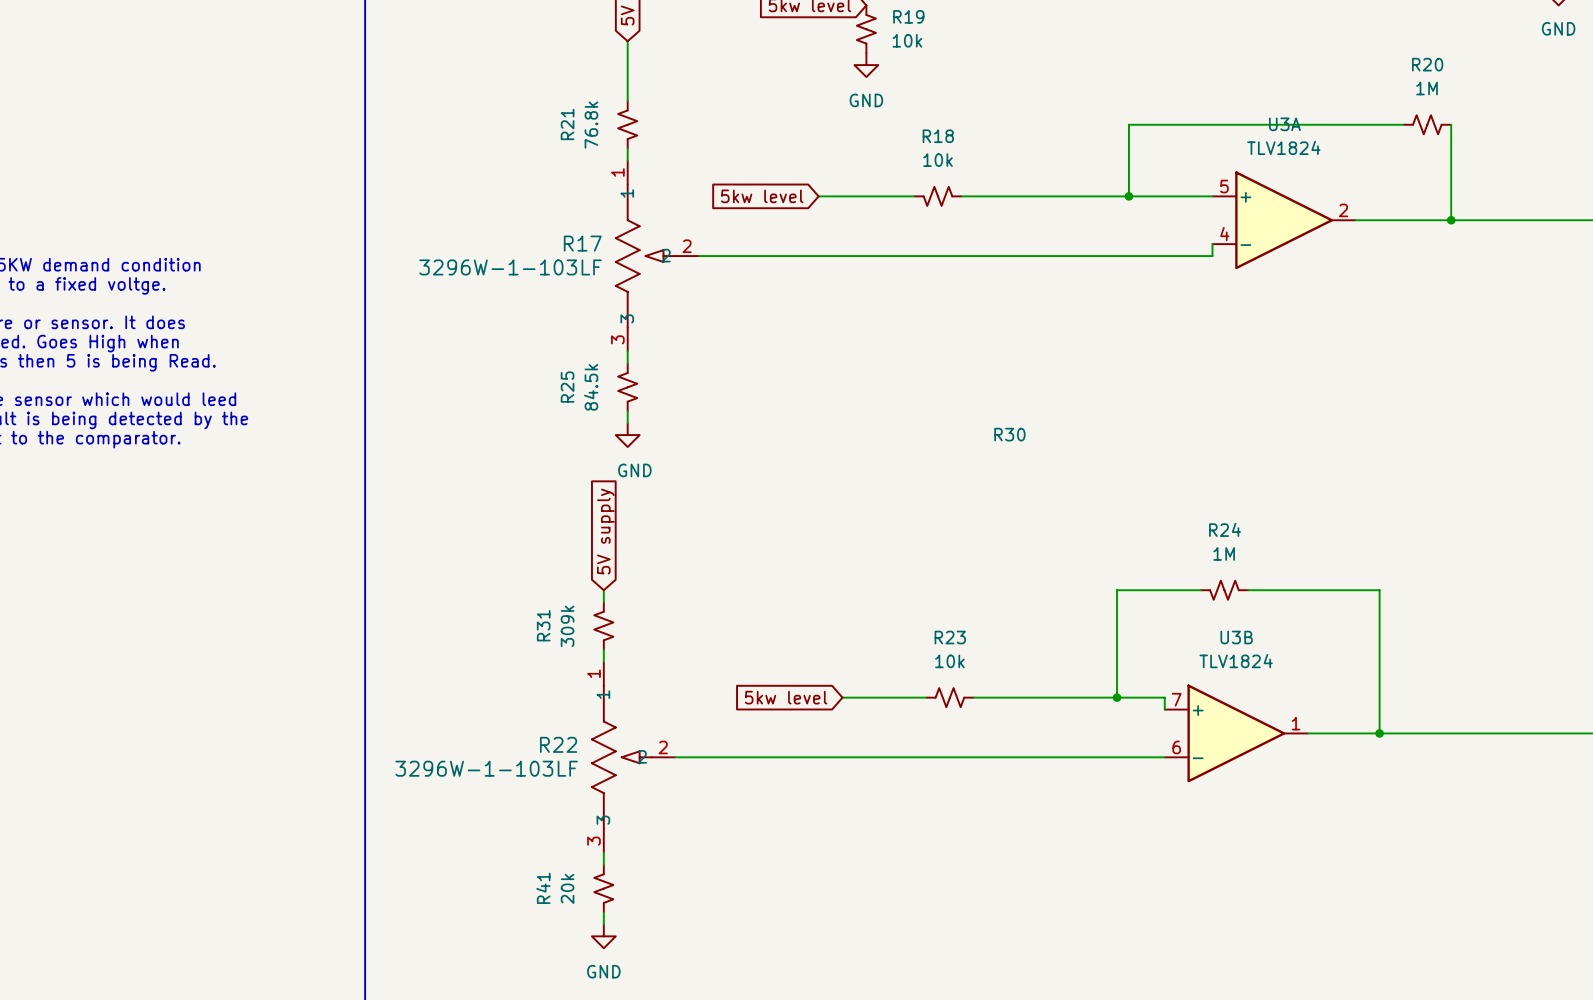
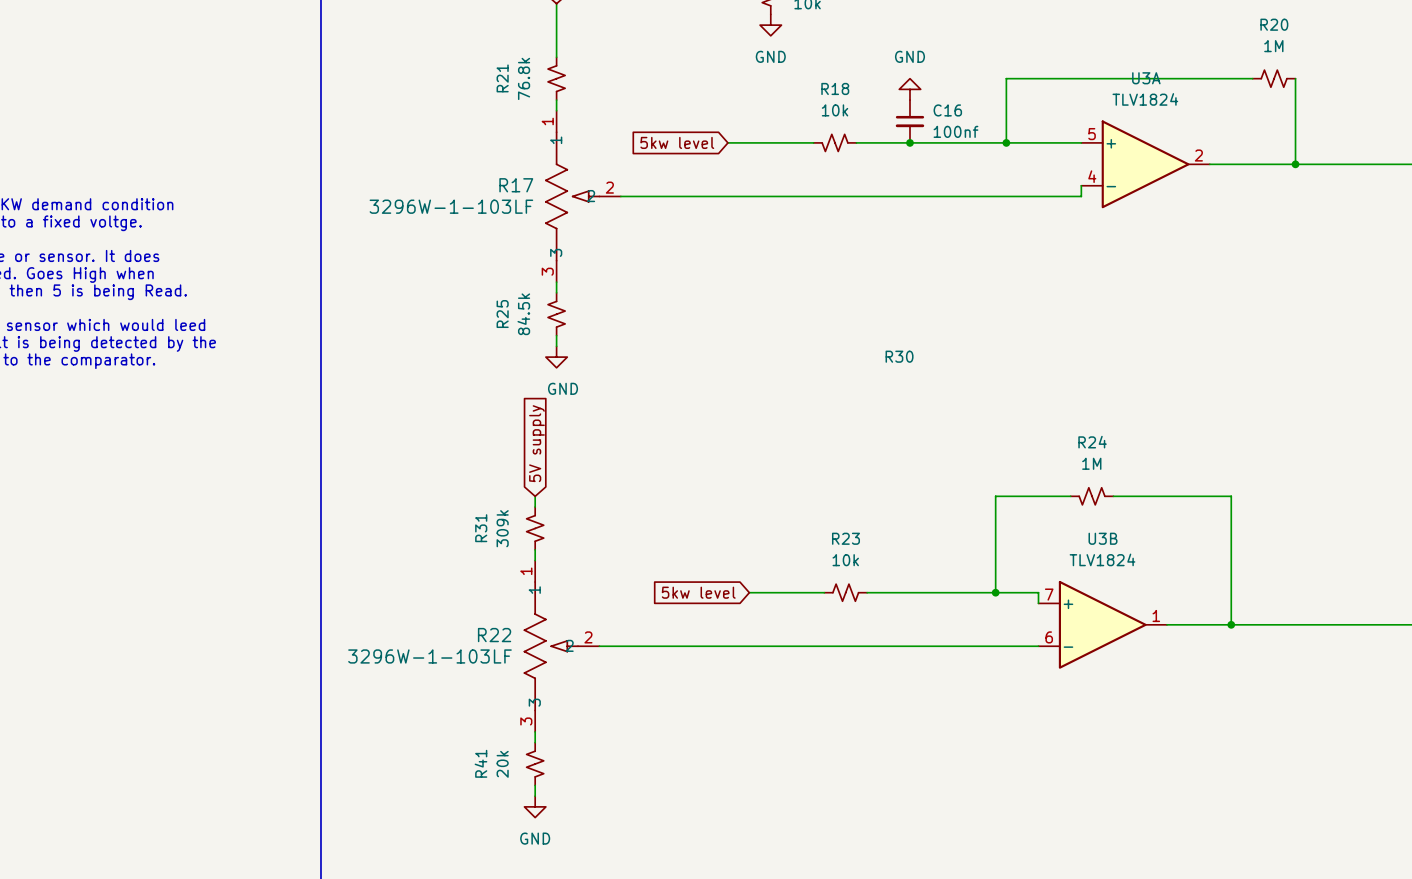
power symbol: none -> GND (909, 89)
C16: none -> 100nf (909, 121)
junction: none -> (909, 142)

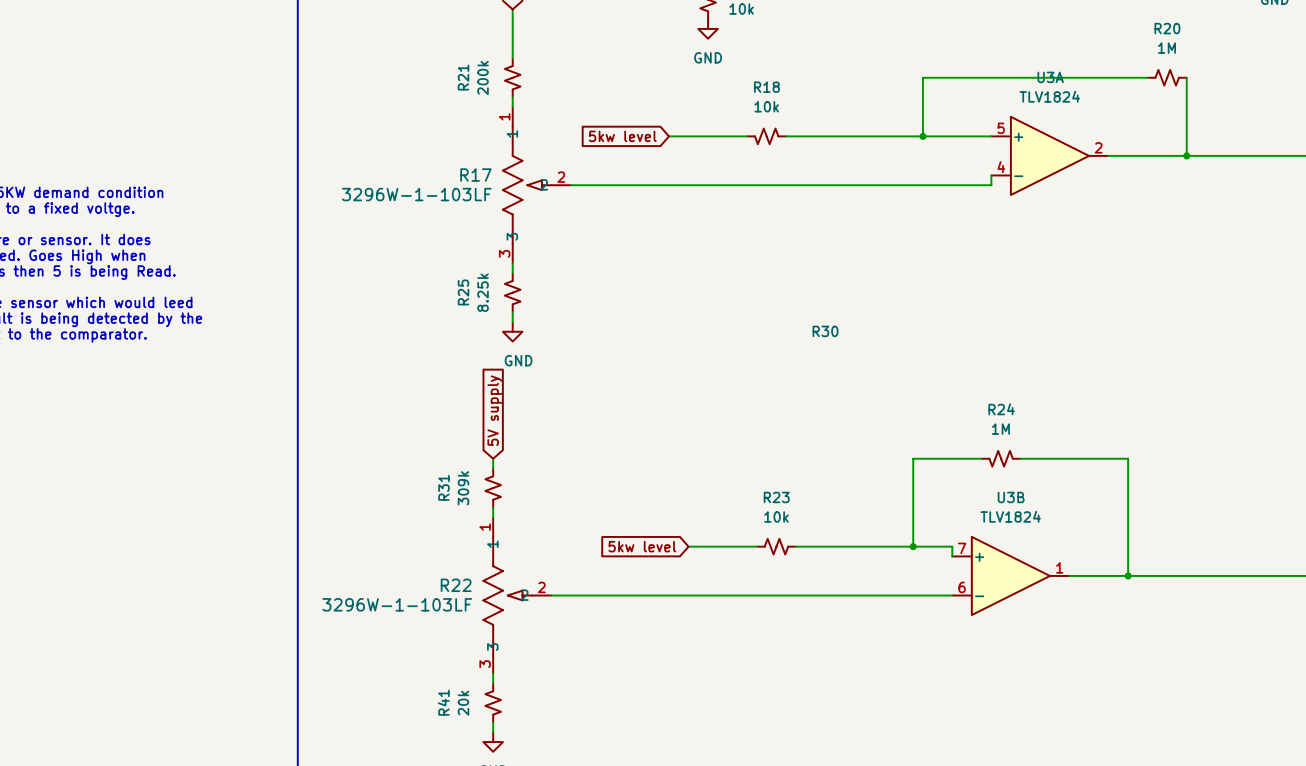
R21 value: 76.8k (524, 78) -> 200k (483, 78)
power symbol: GND (909, 89) -> none
C16: 100nf (909, 121) -> none
junction: (909, 142) -> none
R25 value: 84.5k (523, 314) -> 8.25k (483, 292)

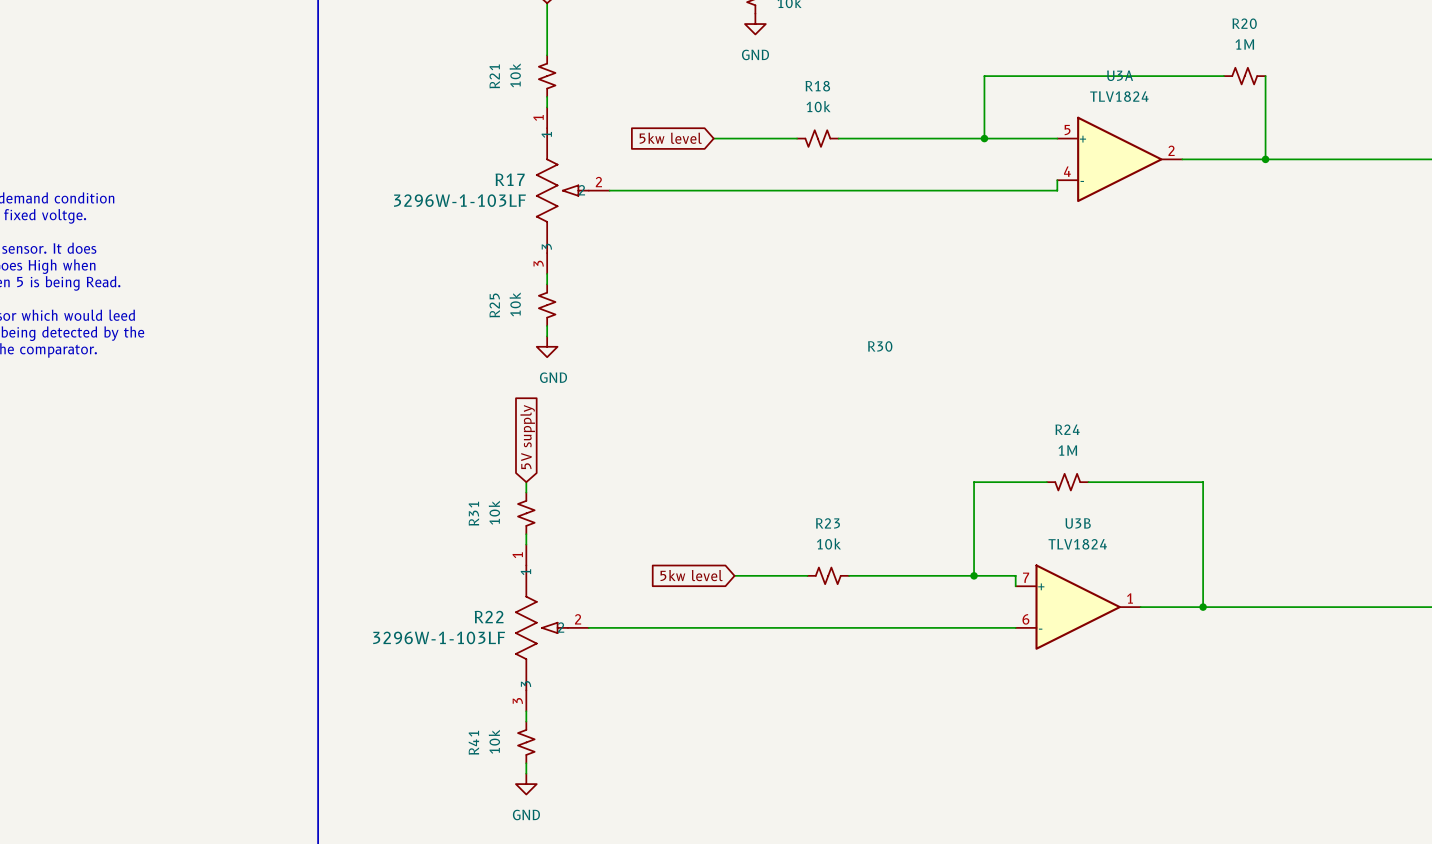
R21 value: 200k (483, 78) -> 10k (515, 75)
R25 value: 8.25k (483, 292) -> 10k (515, 304)
R31 value: 309k (463, 488) -> 10k (494, 512)
R41 value: 20k (463, 703) -> 10k (494, 741)

